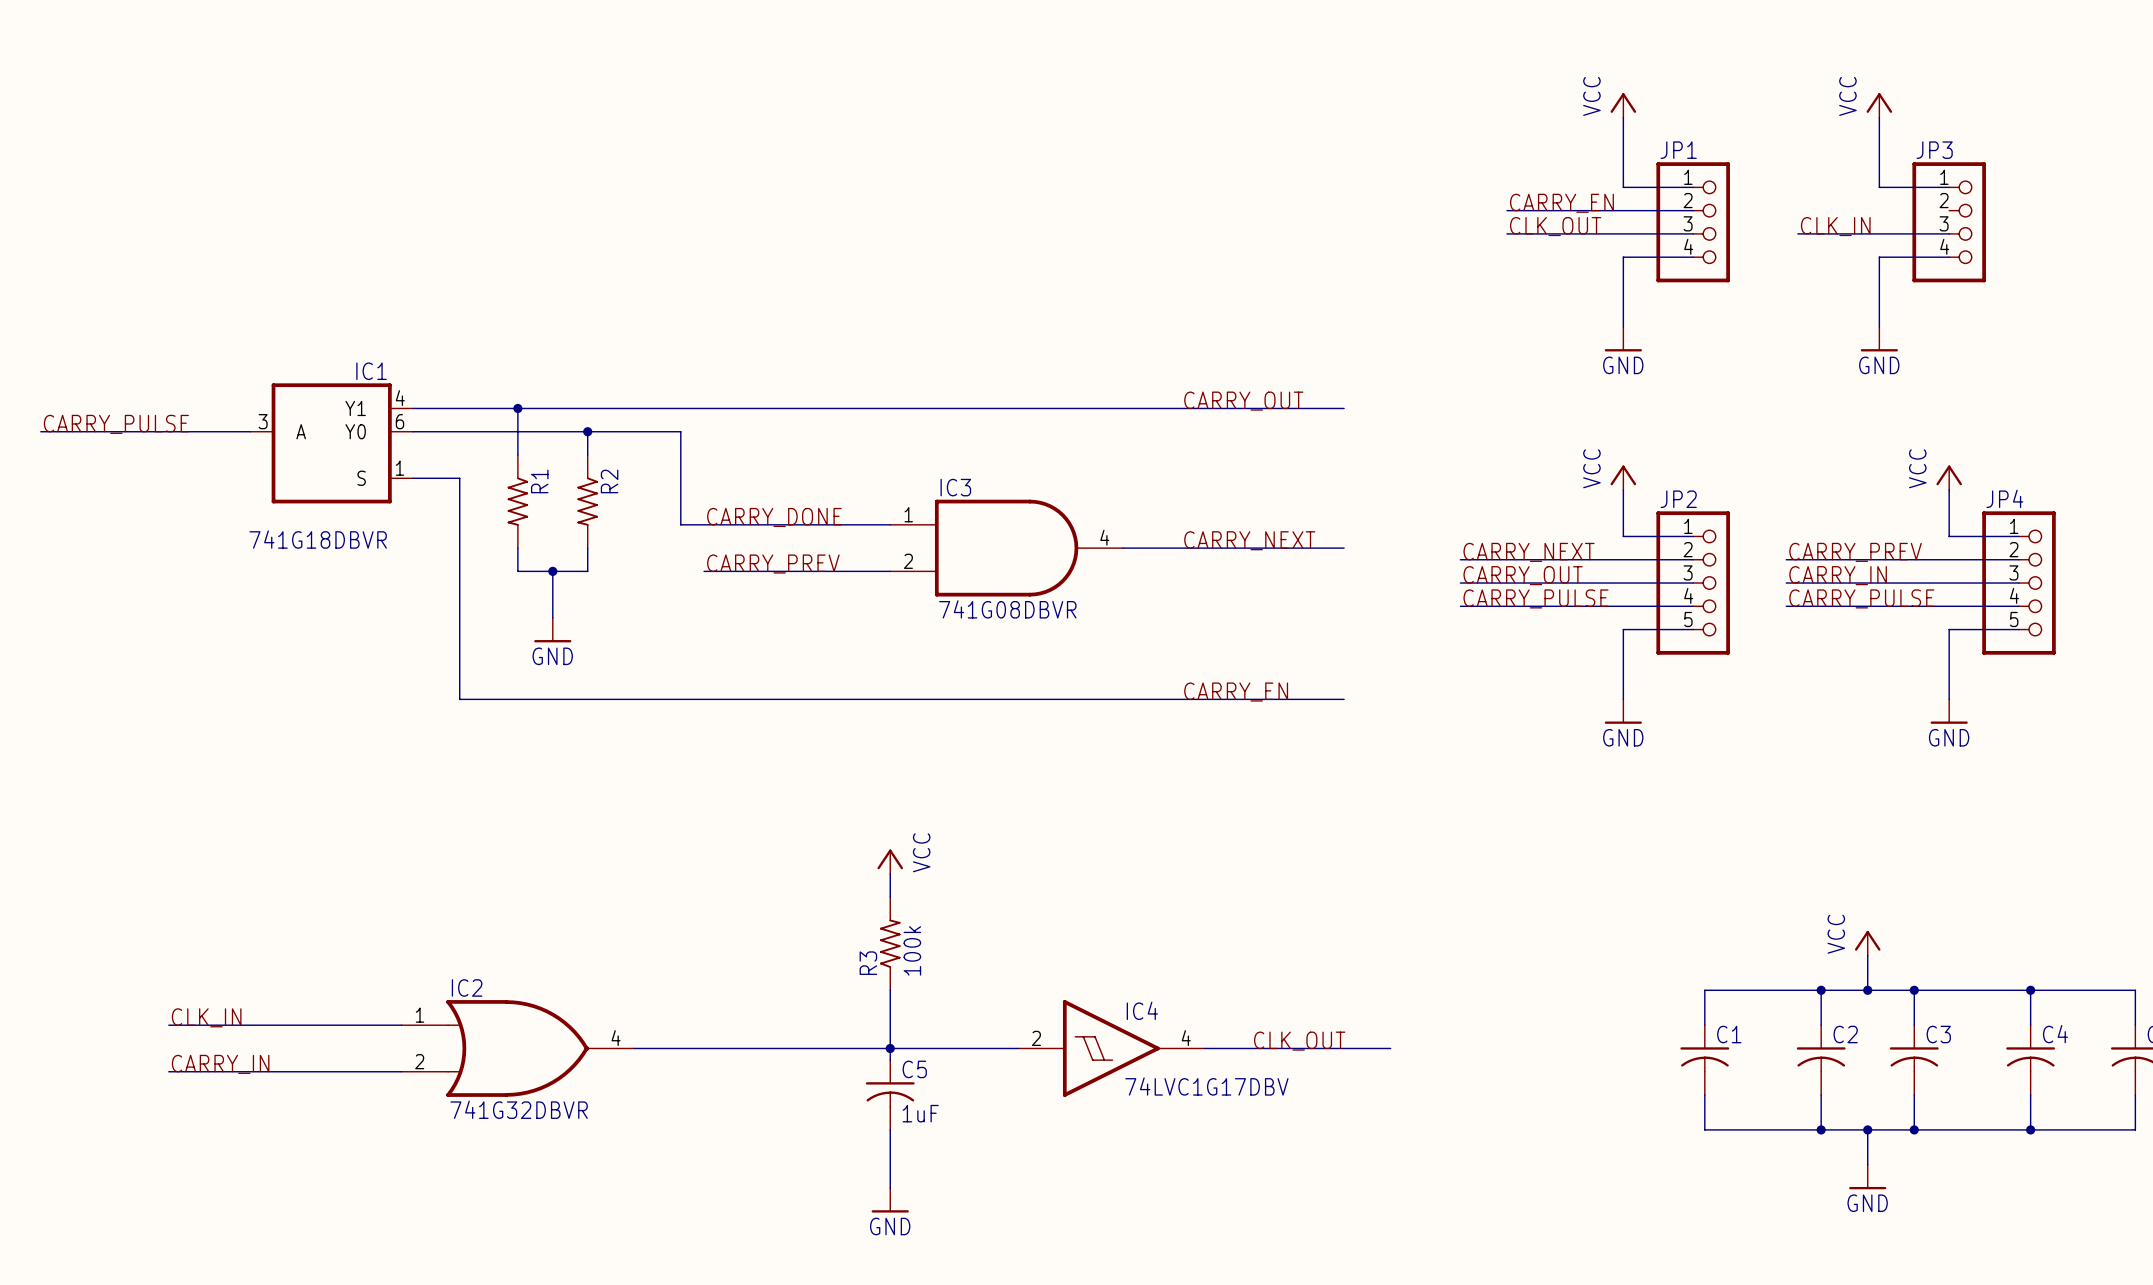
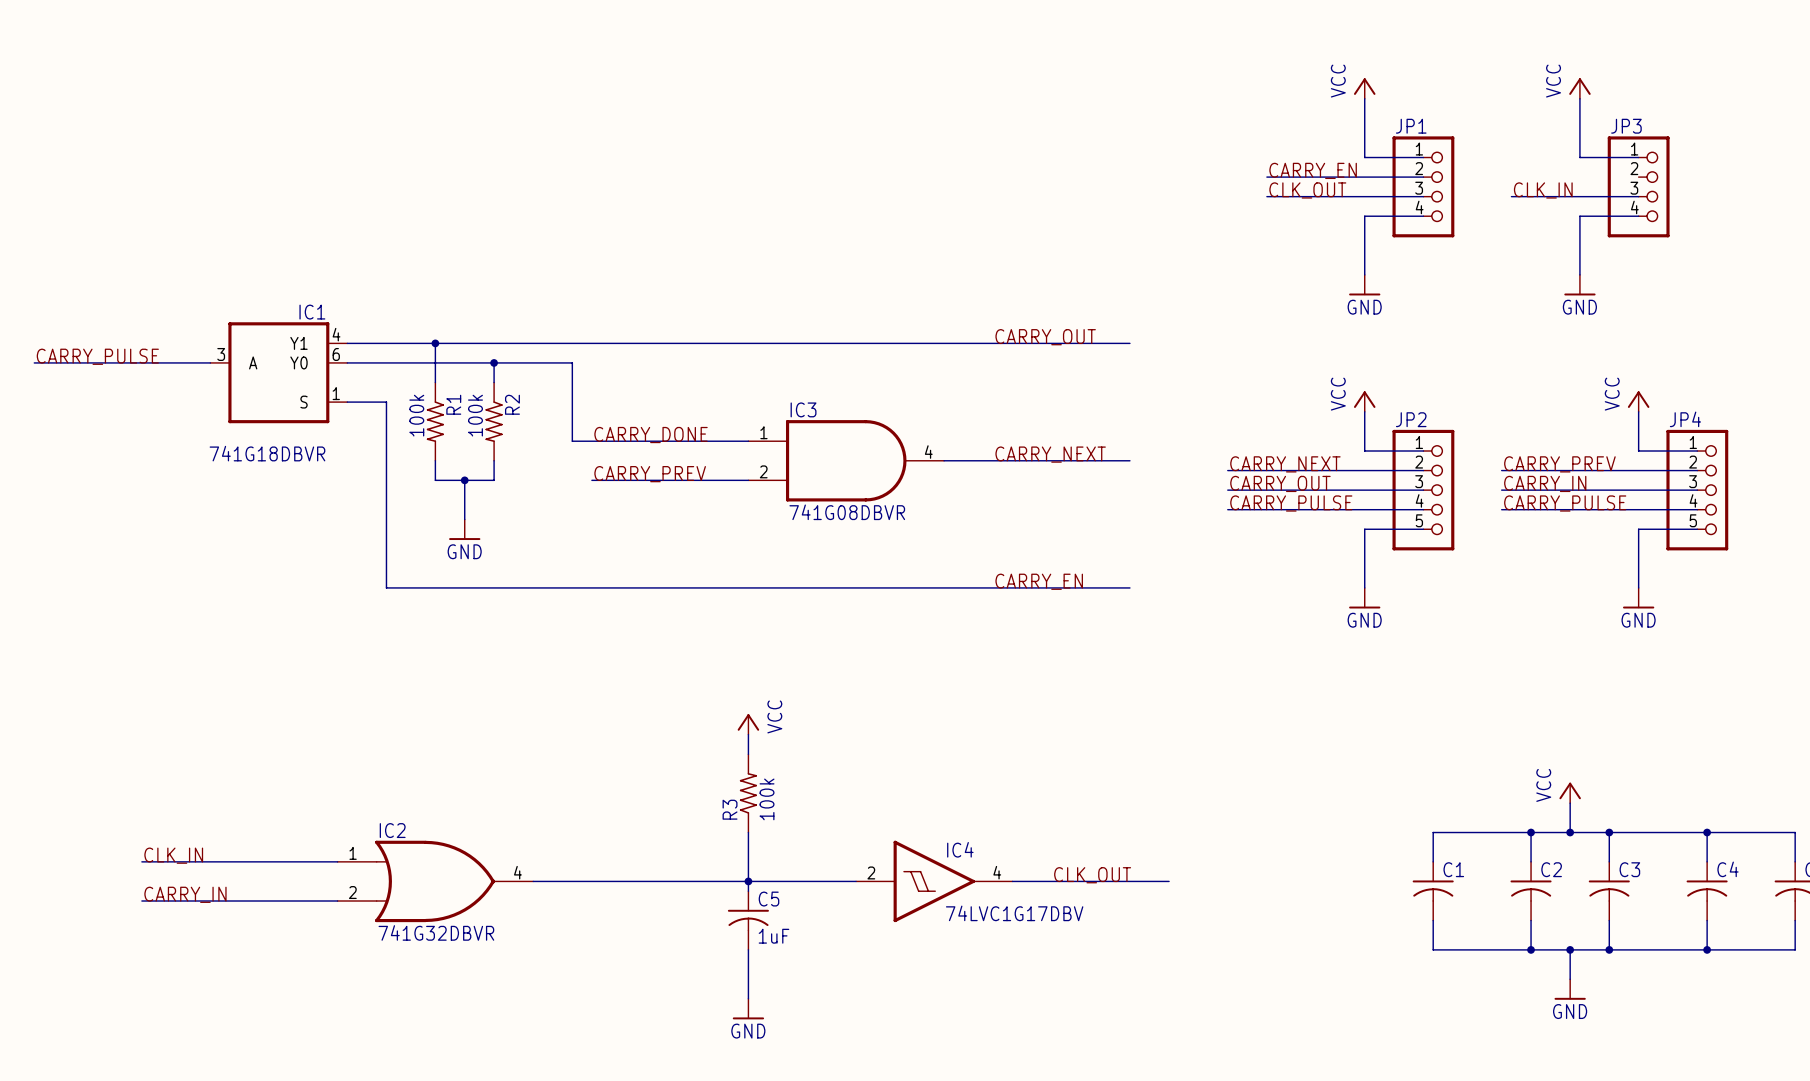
R1 value: none -> 100k (416, 415)
R2 value: none -> 100k (475, 415)

